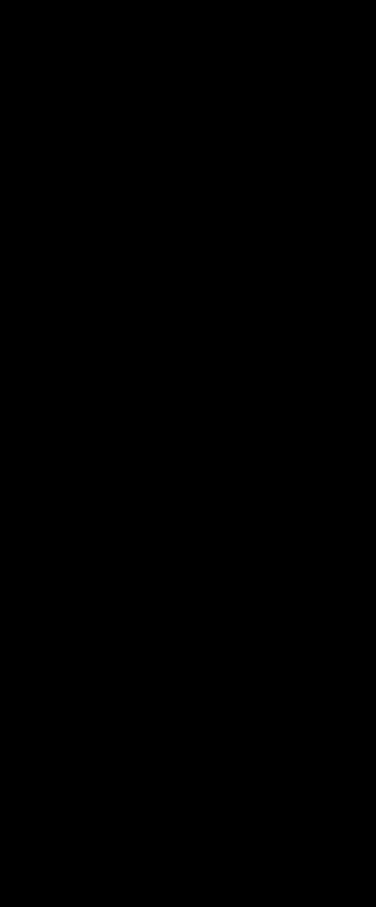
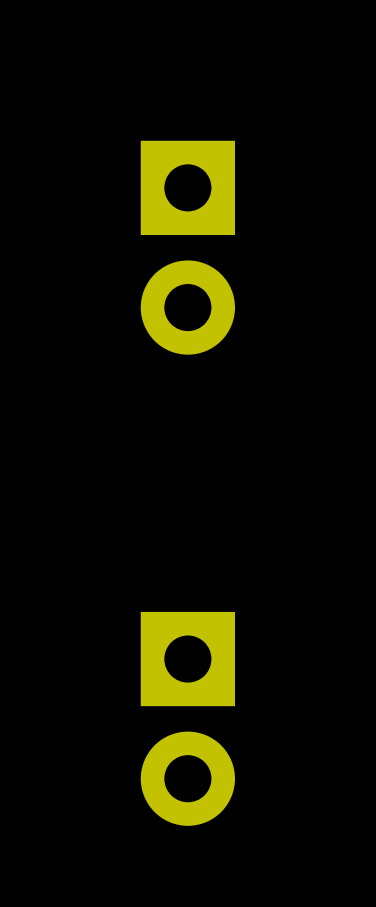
part: none -> (187, 247)
part: none -> (187, 718)

